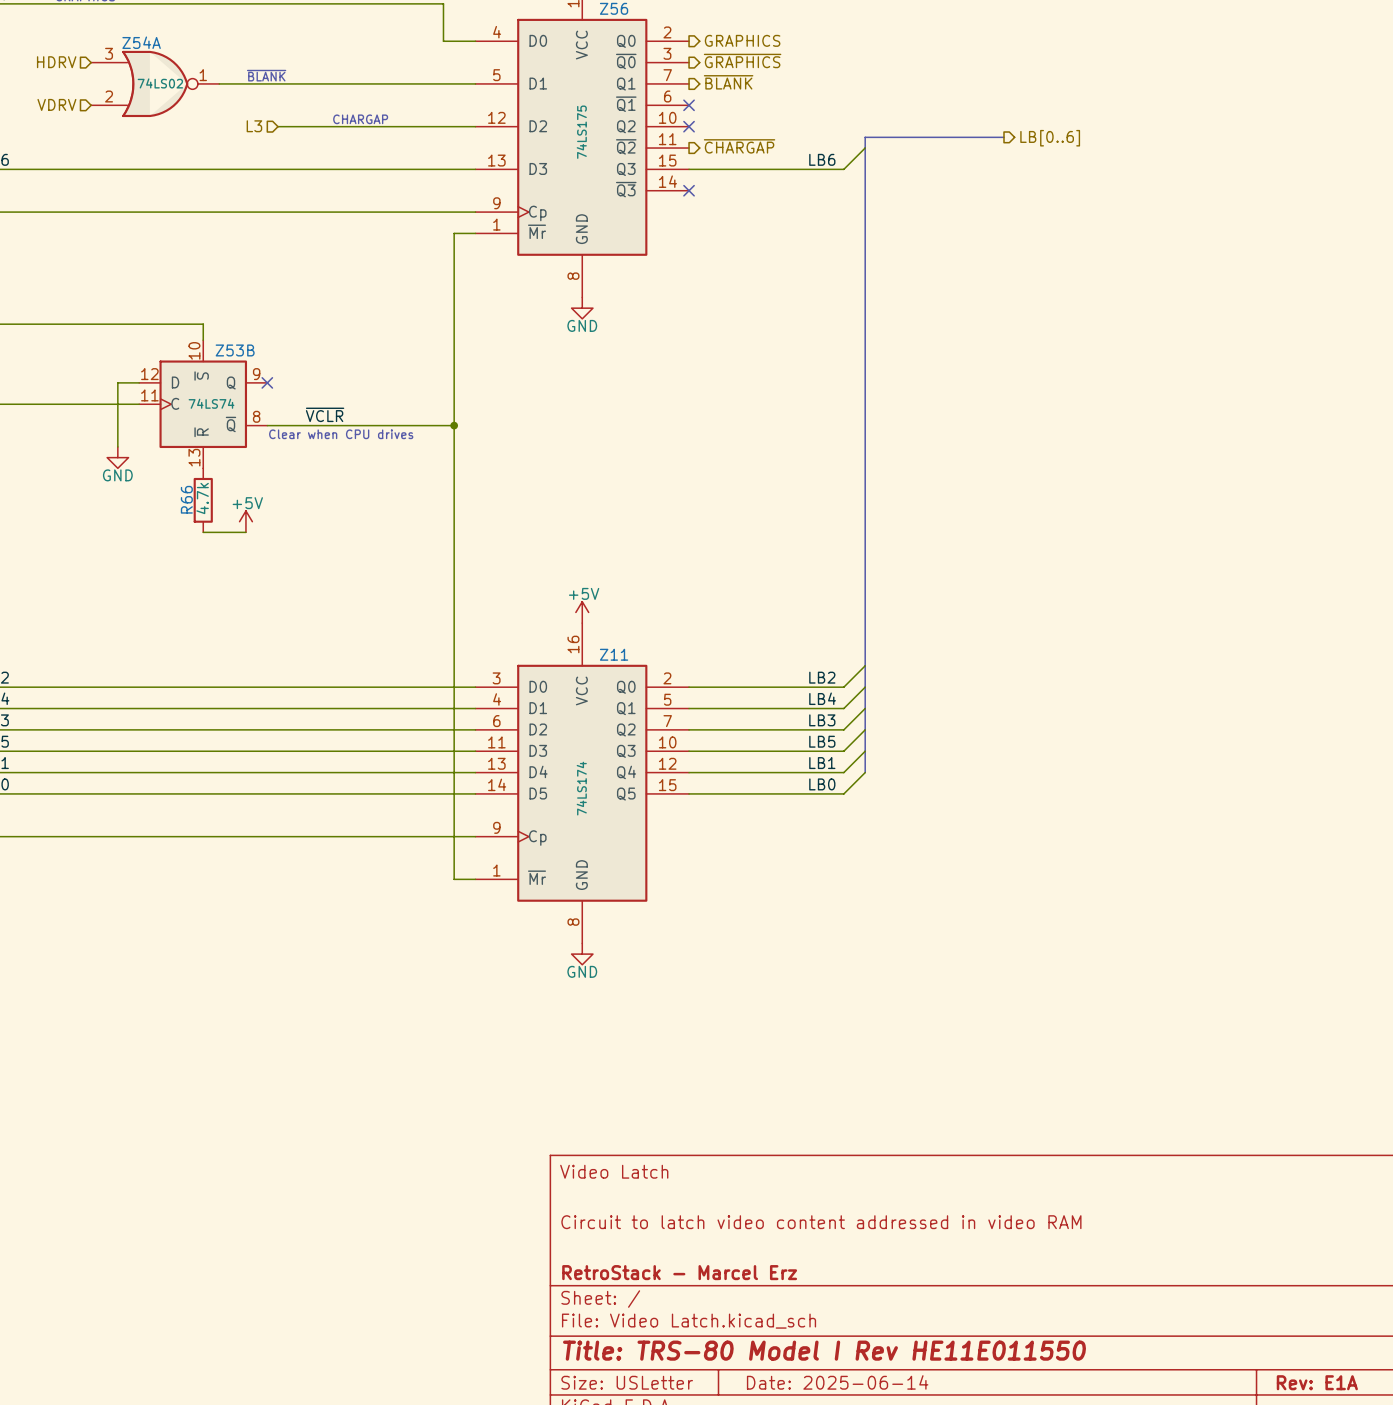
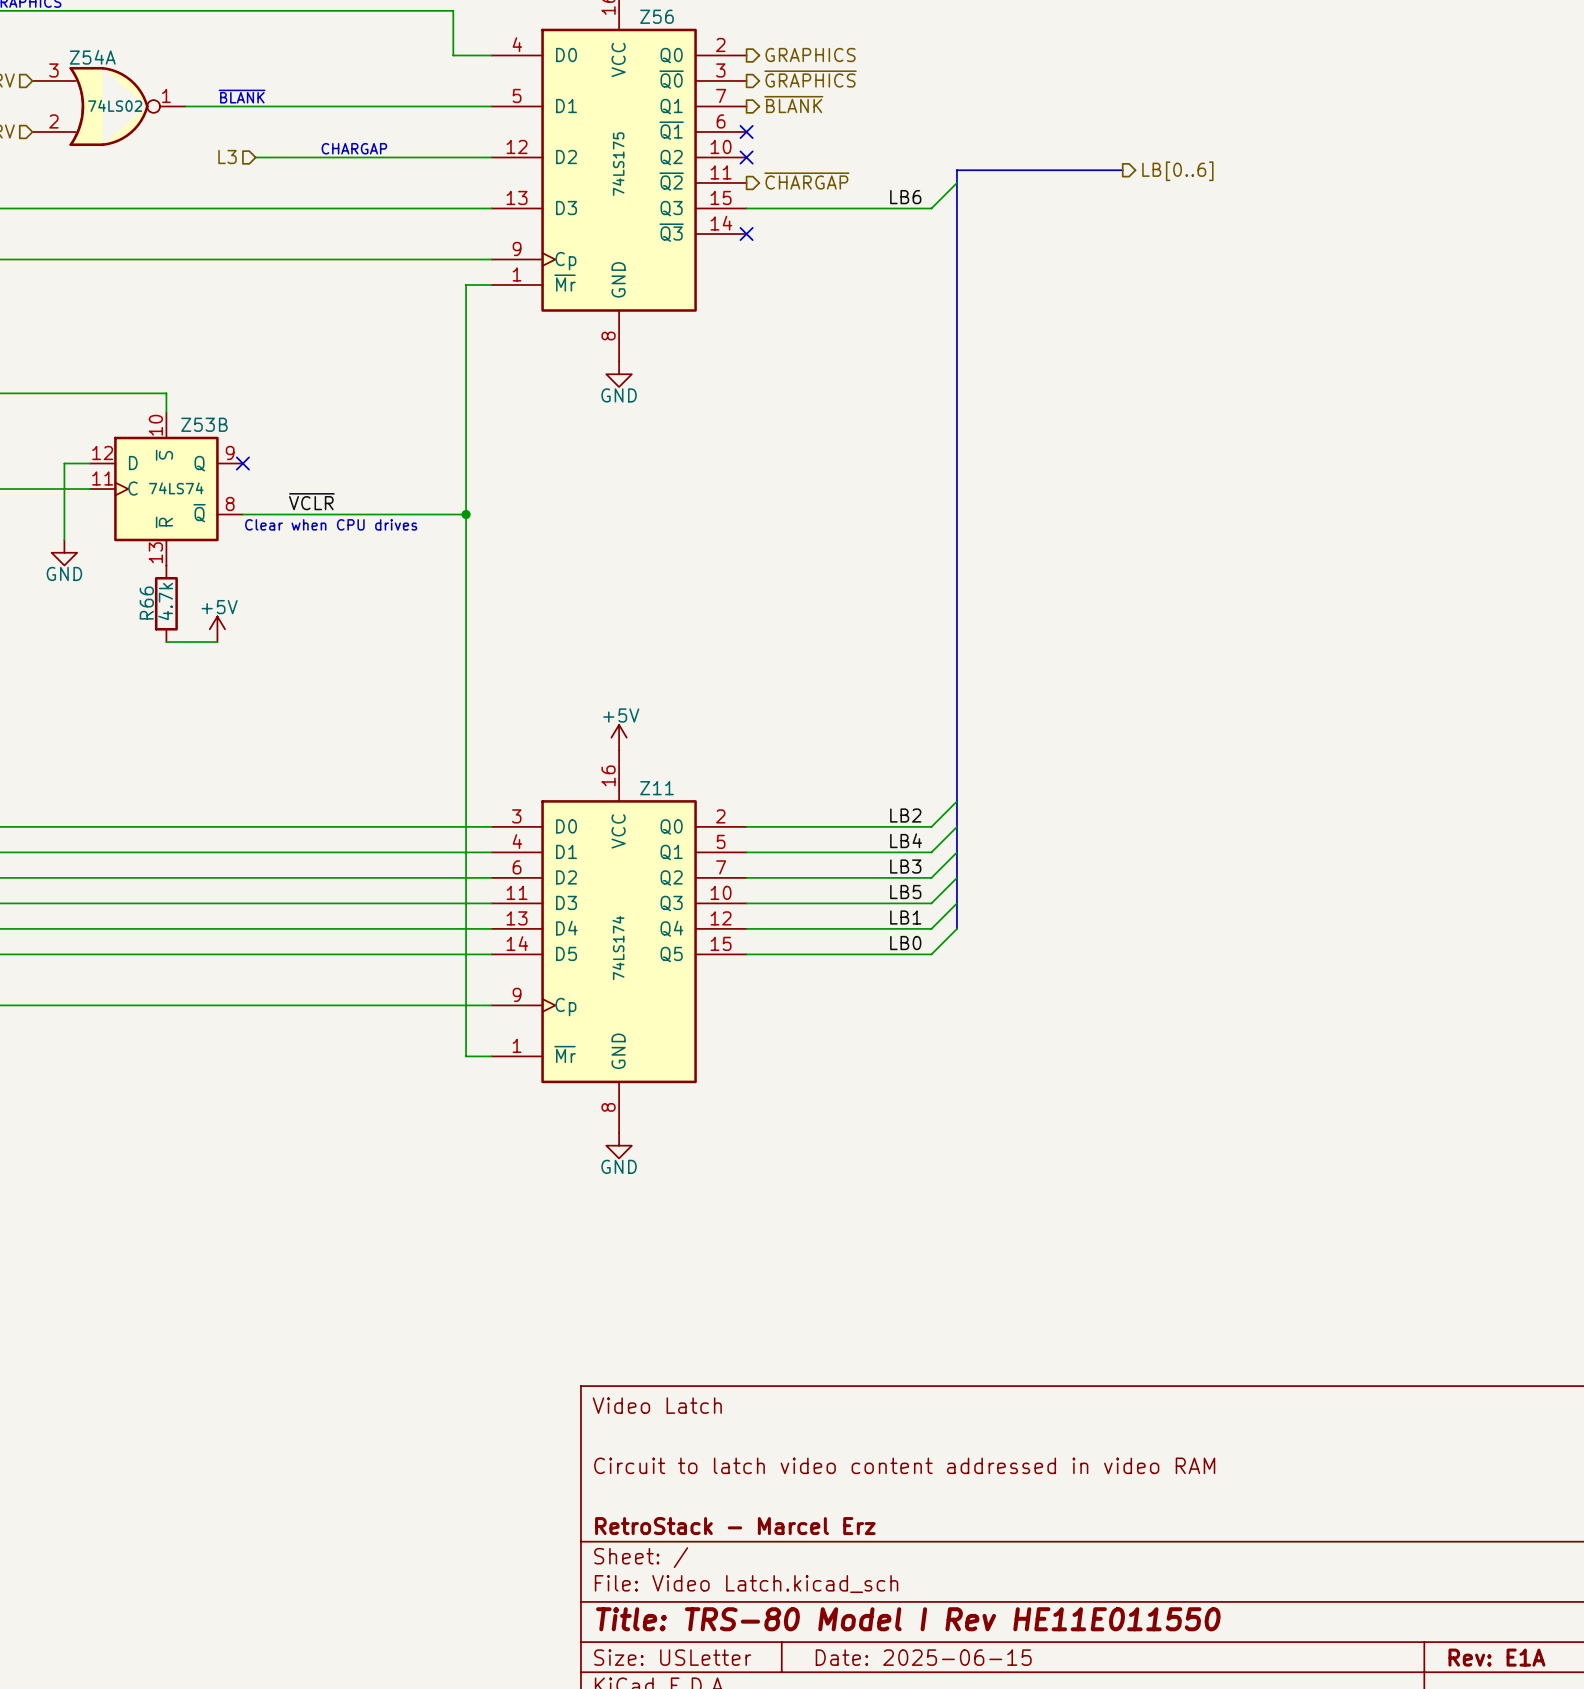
title block: Date: 2025-06-14 (837, 1382) -> Date: 2025-06-15 (923, 1657)

